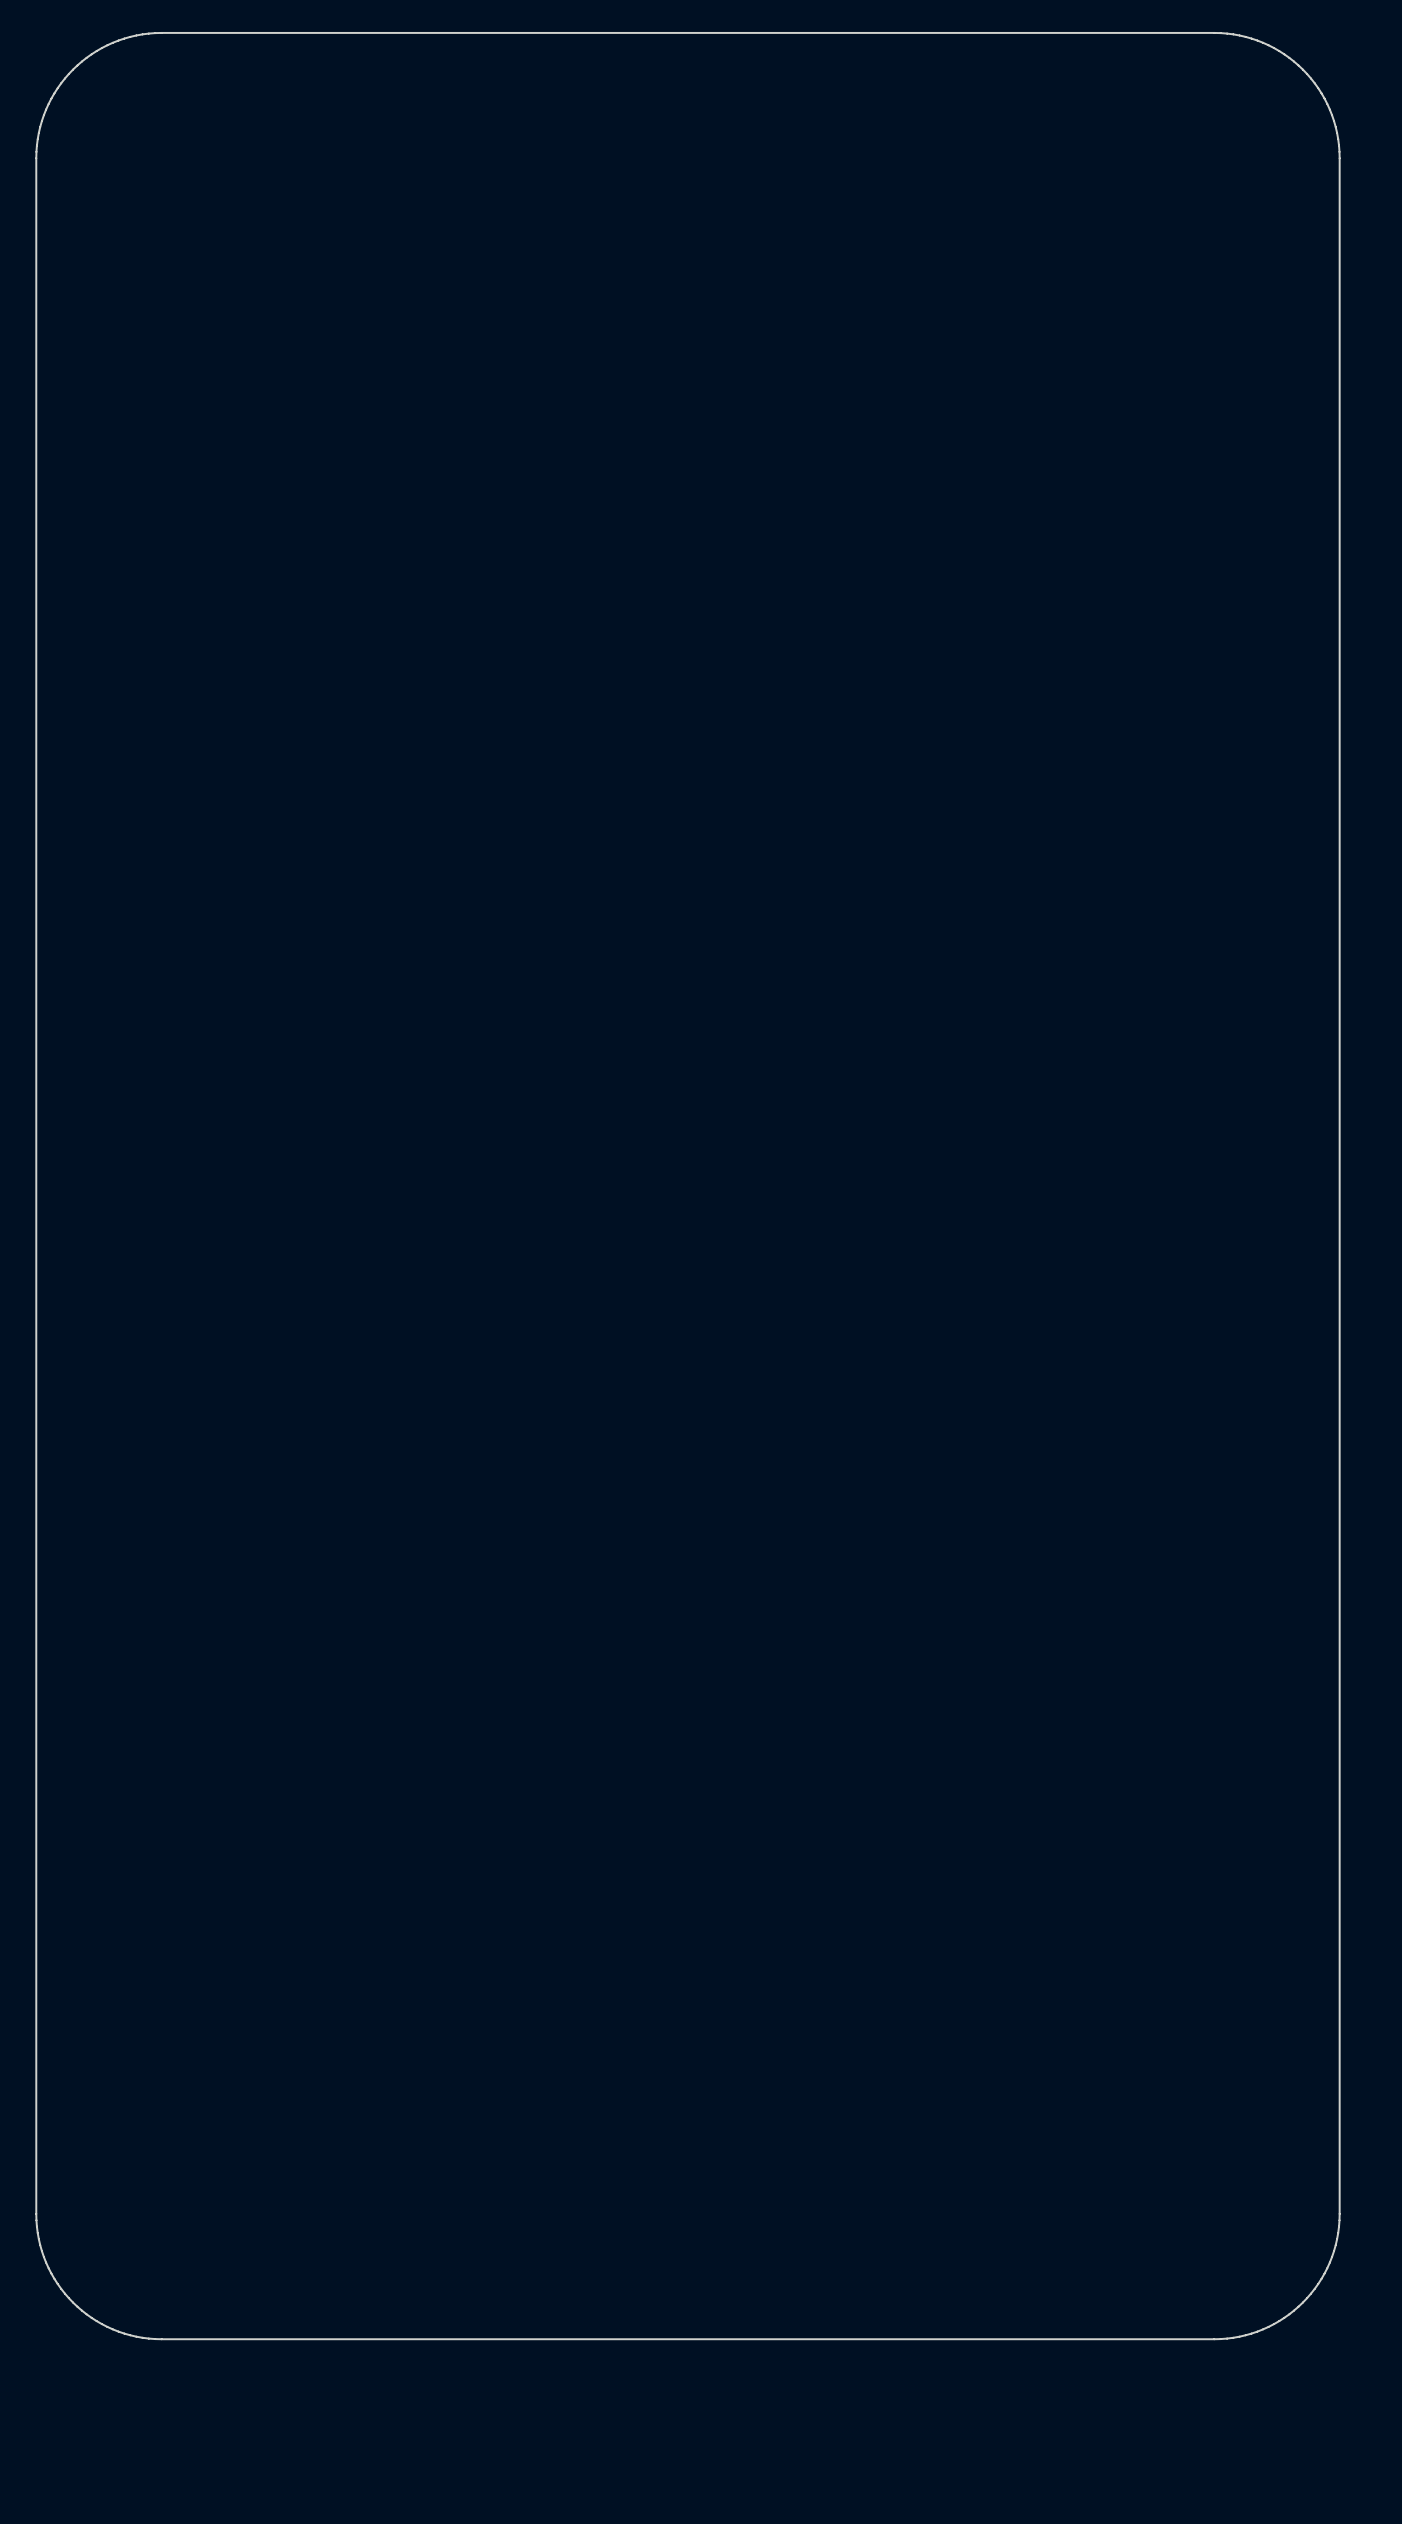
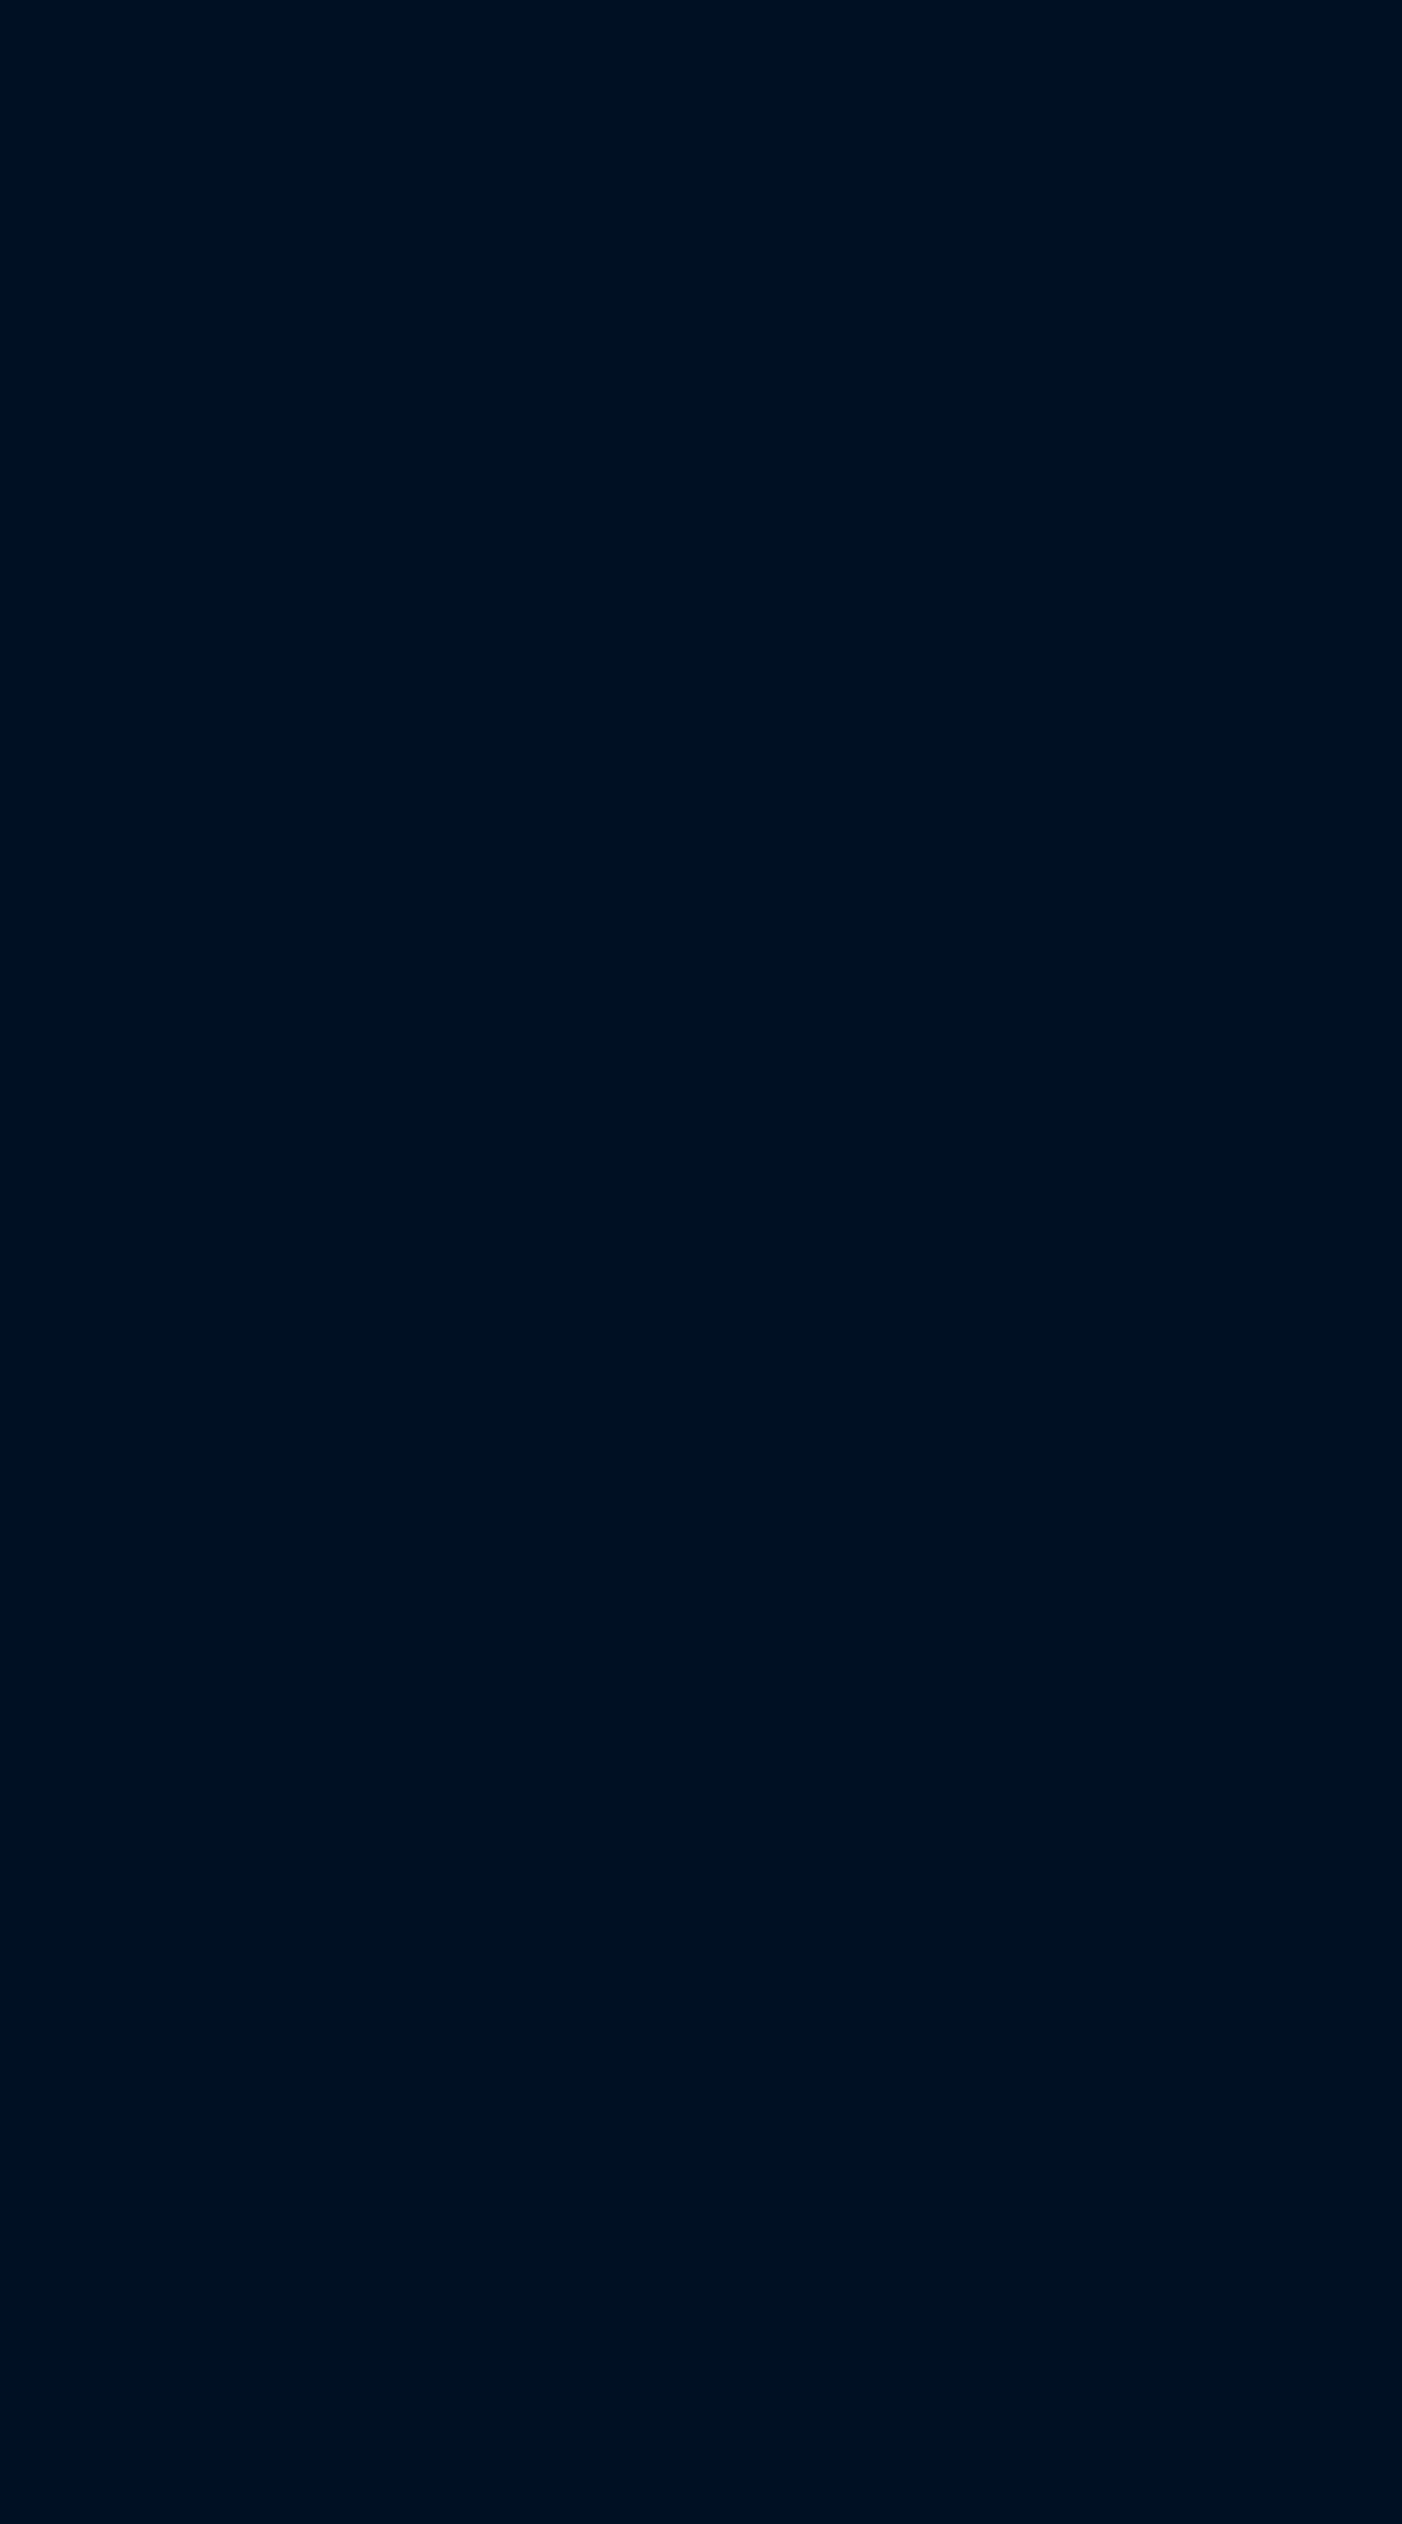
board edge: (155, 33) (136, 35) (112, 42) (91, 54) (73, 69) (57, 88) (46, 109) (38, 133) (36, 151) (36, 2213) (38, 2239) (48, 2268) (64, 2293) (91, 2317) (124, 2333) (155, 2339) (1214, 2339) (1239, 2336) (1268, 2326) (1294, 2310) (1318, 2283) (1334, 2251) (1339, 2220) (1339, 158) (1337, 133) (1327, 103) (1311, 78) (1284, 54) (1251, 38) (1220, 33) (155, 33) -> none

